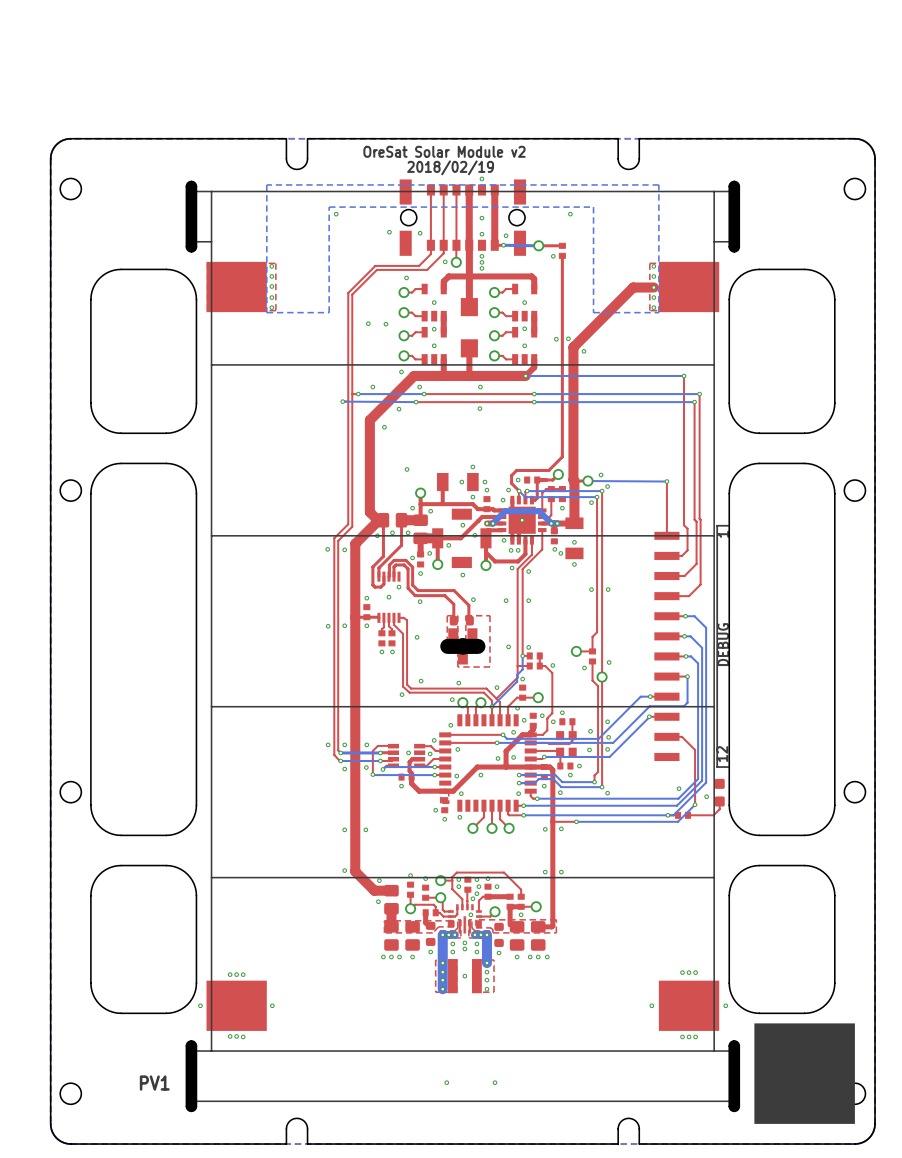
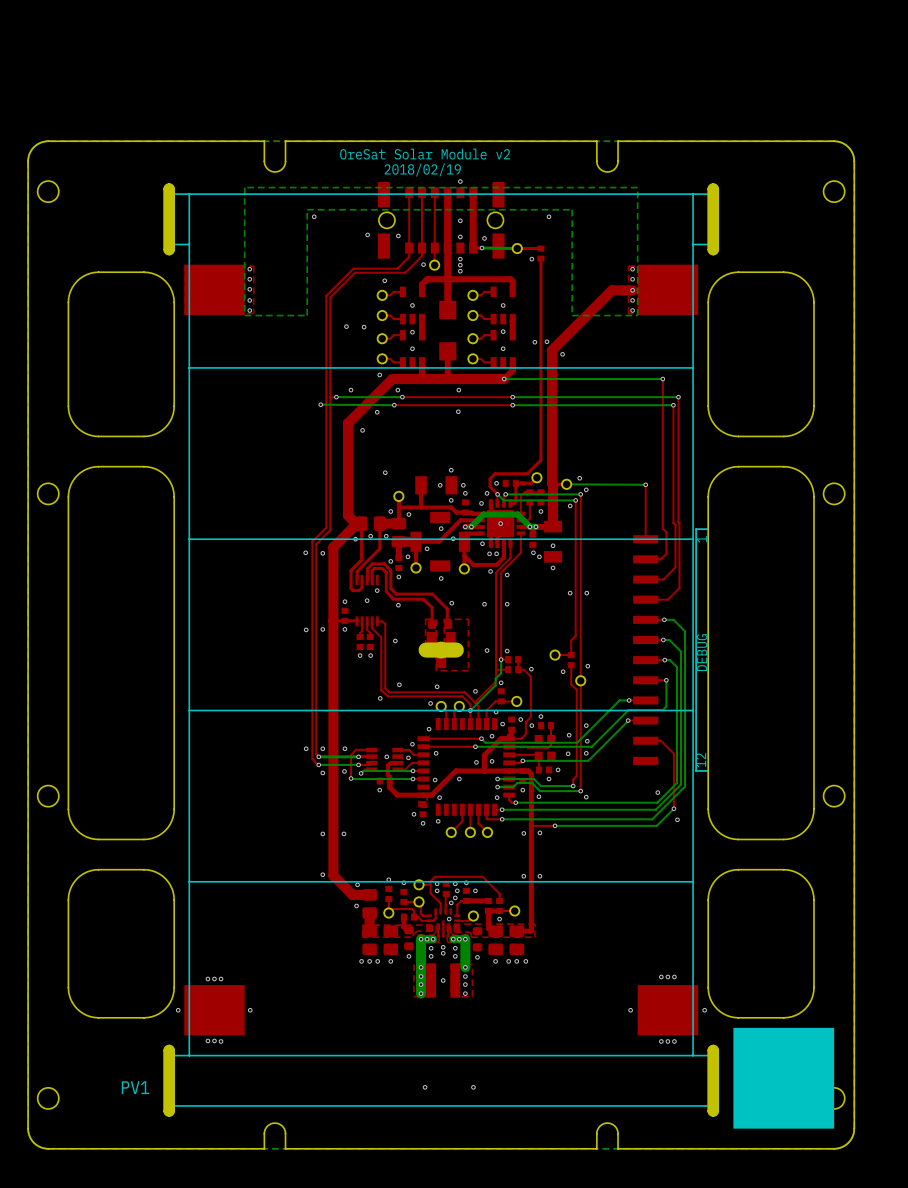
part: (719, 792) -> none
via: (706, 796) -> none
top track: (719, 801) (719, 809) (713, 815) (688, 815) -> none
via: (667, 815) -> none
part: (683, 815) -> none
via: none -> (677, 819)

